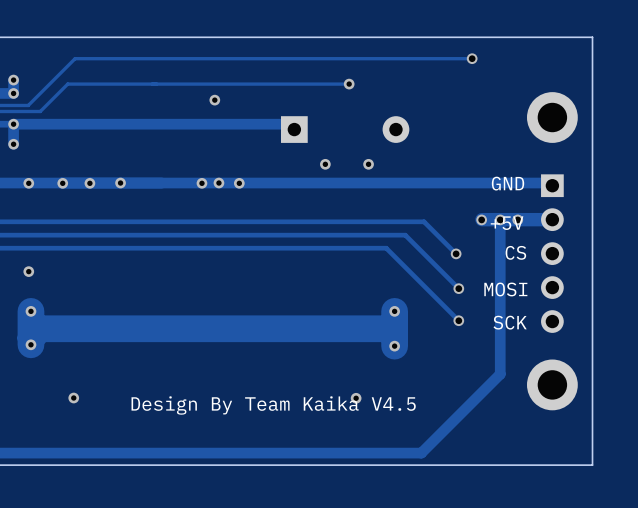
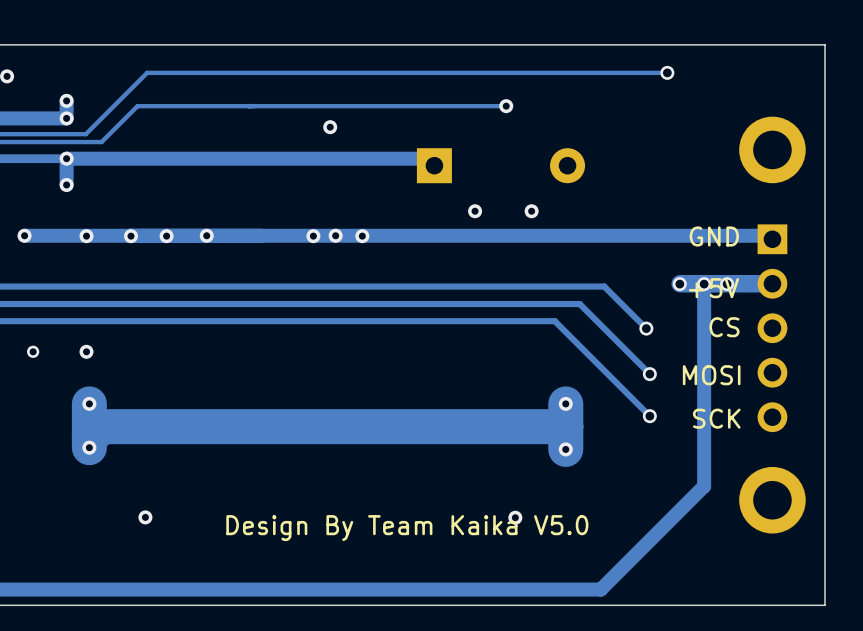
text: Design By Team Kaika V4.5 (273, 405) -> Design By Team Kaika V5.0 (407, 528)

